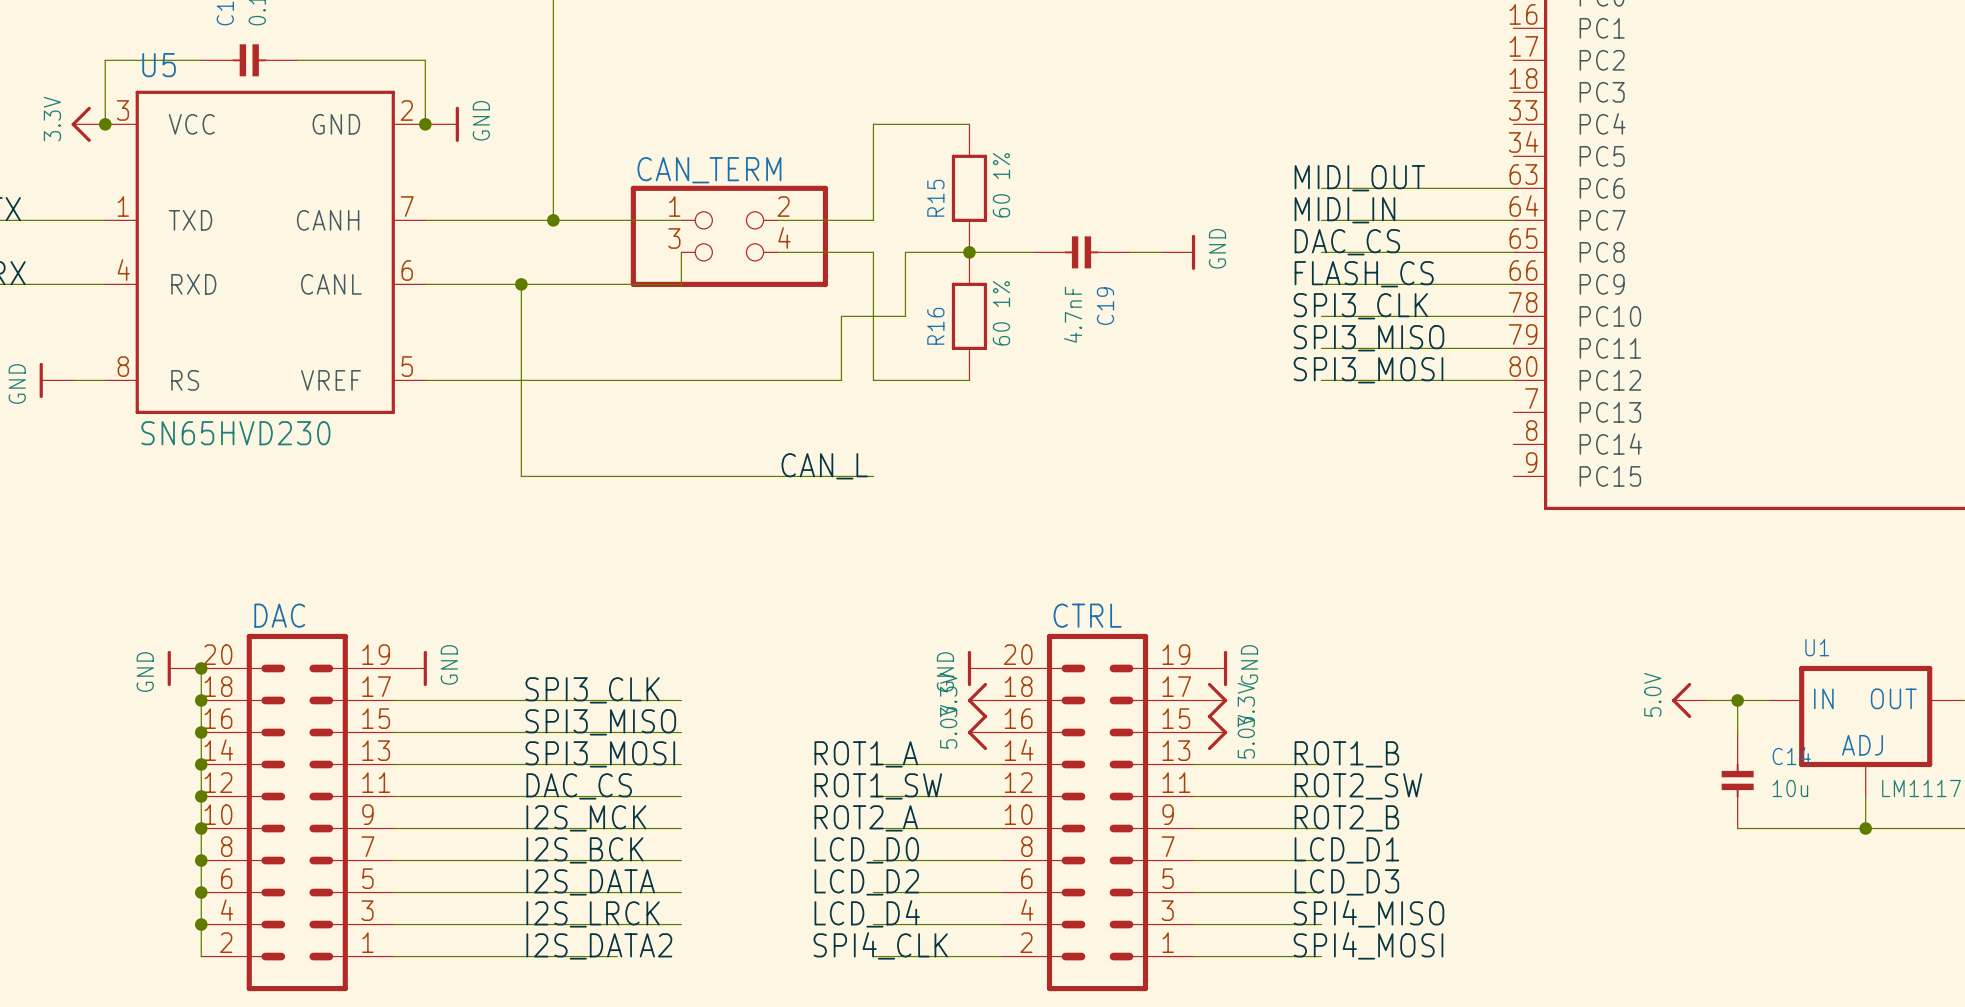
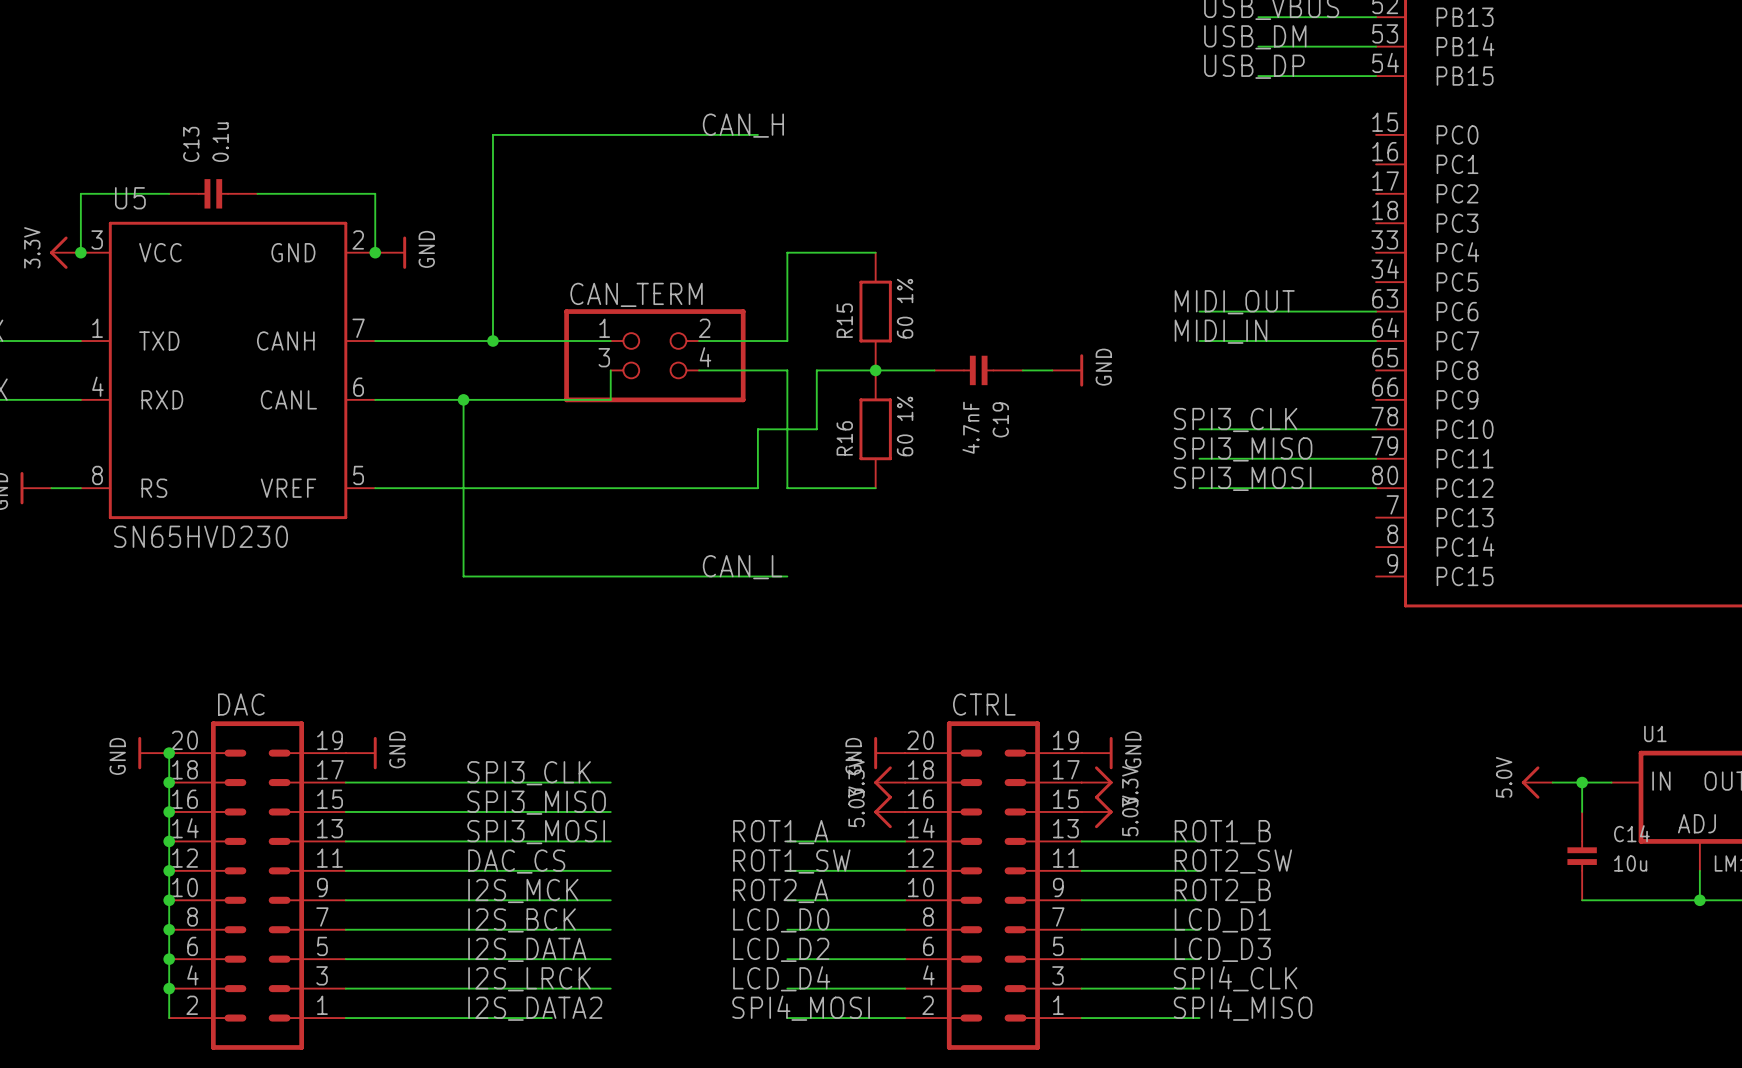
label: DAC_CS (1347, 242) -> none
wire: (1321, 252) (1513, 252) -> none
label: FLASH_CS (1364, 274) -> none
wire: (1321, 284) (1513, 284) -> none
label: SPI4_MISO (1368, 913) -> SPI4_CLK (1235, 978)
label: SPI4_CLK (880, 945) -> SPI4_MOSI (801, 1008)
label: SPI4_MOSI (1368, 945) -> SPI4_MISO (1243, 1008)

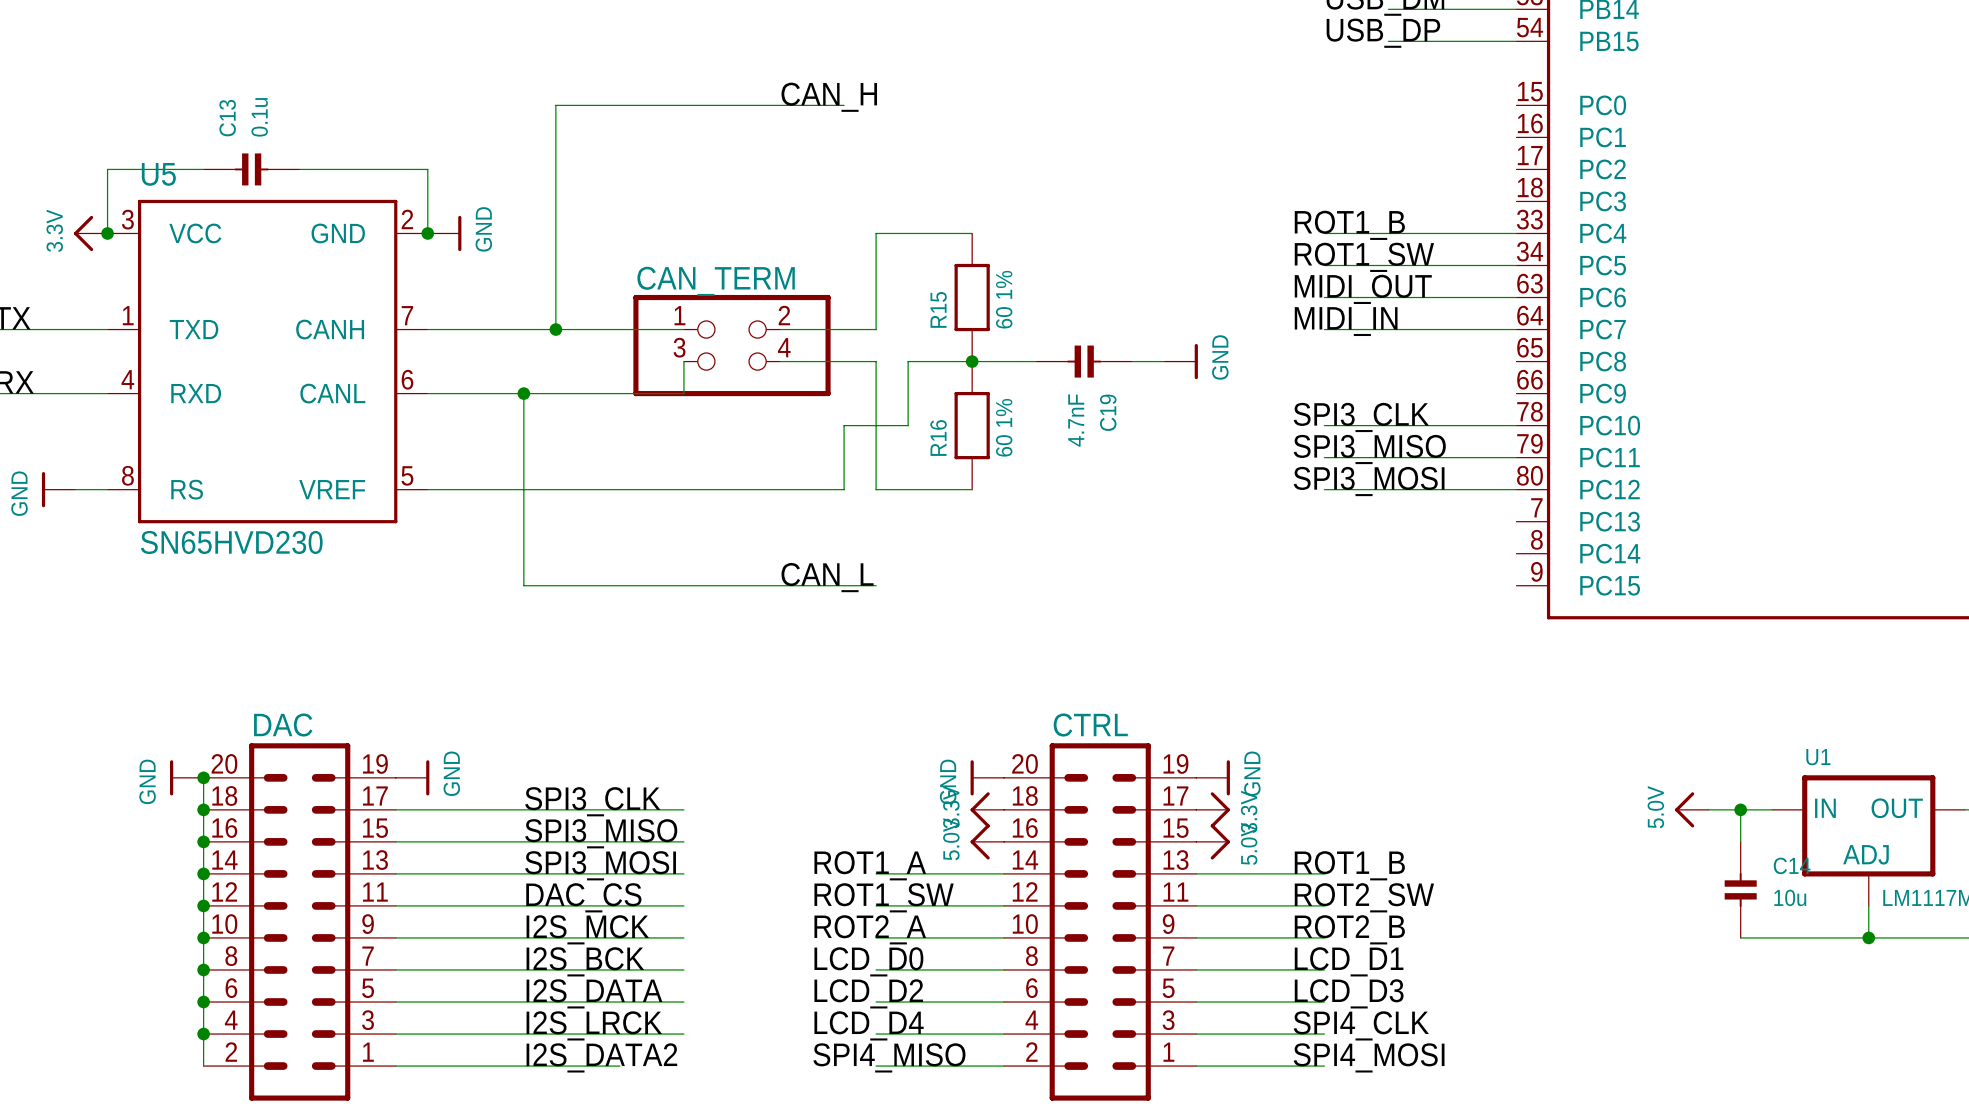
label: none -> ROT1_B (1349, 225)
wire: none -> (1324, 233) (1516, 233)
label: none -> ROT1_SW (1364, 257)
wire: none -> (1324, 265) (1516, 265)
label: SPI4_MOSI (801, 1008) -> SPI4_MISO (889, 1057)
label: SPI4_MISO (1243, 1008) -> SPI4_MOSI (1369, 1057)

